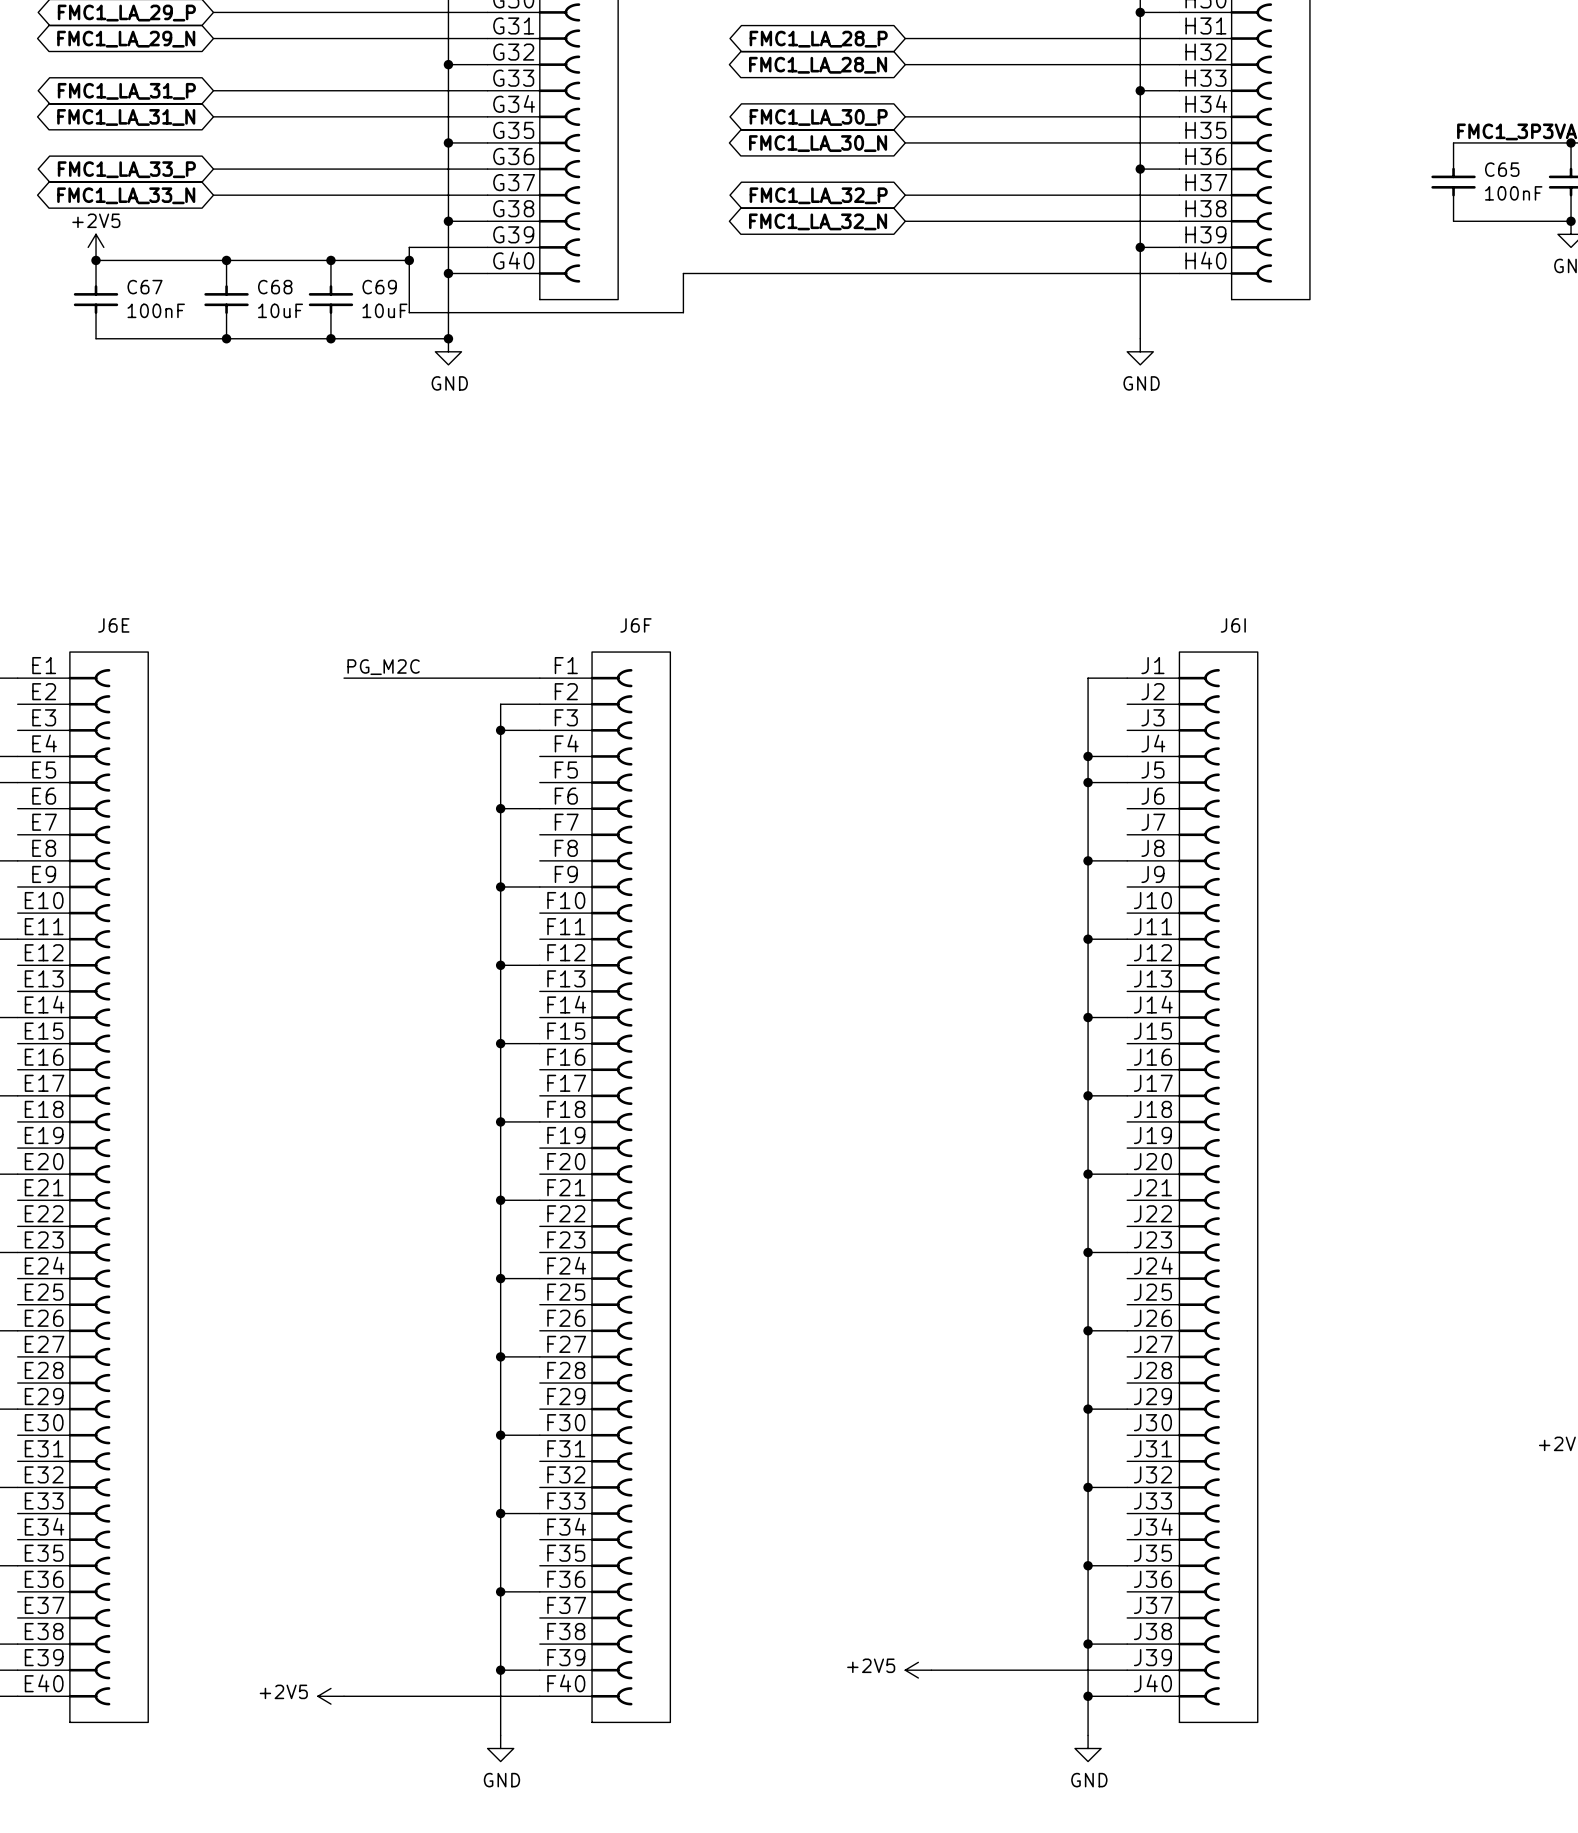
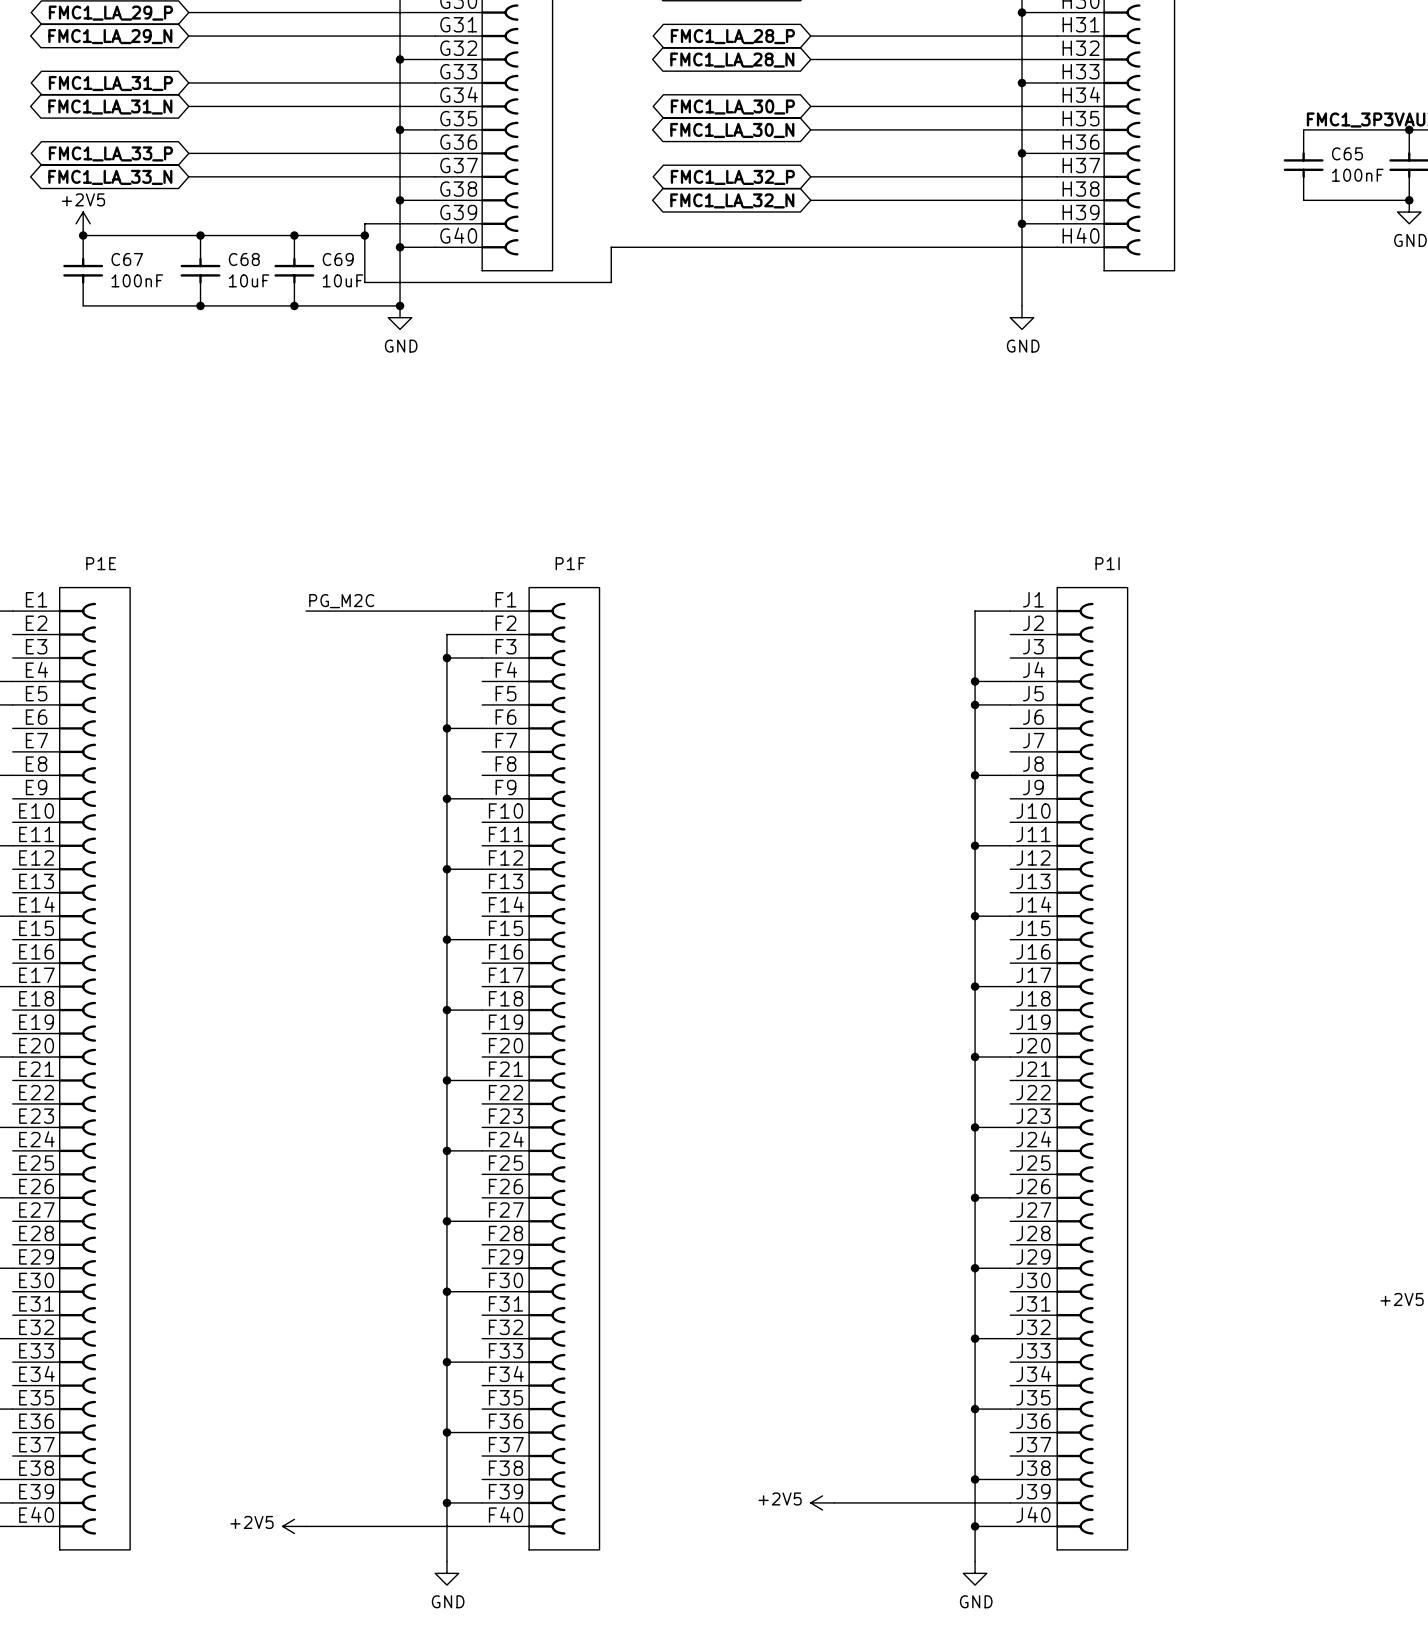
J6E name: J6E (113, 625) -> P1E (101, 563)
J6F name: J6F (635, 625) -> P1F (570, 563)
J6I name: J6I (1233, 625) -> P1I (1107, 563)

